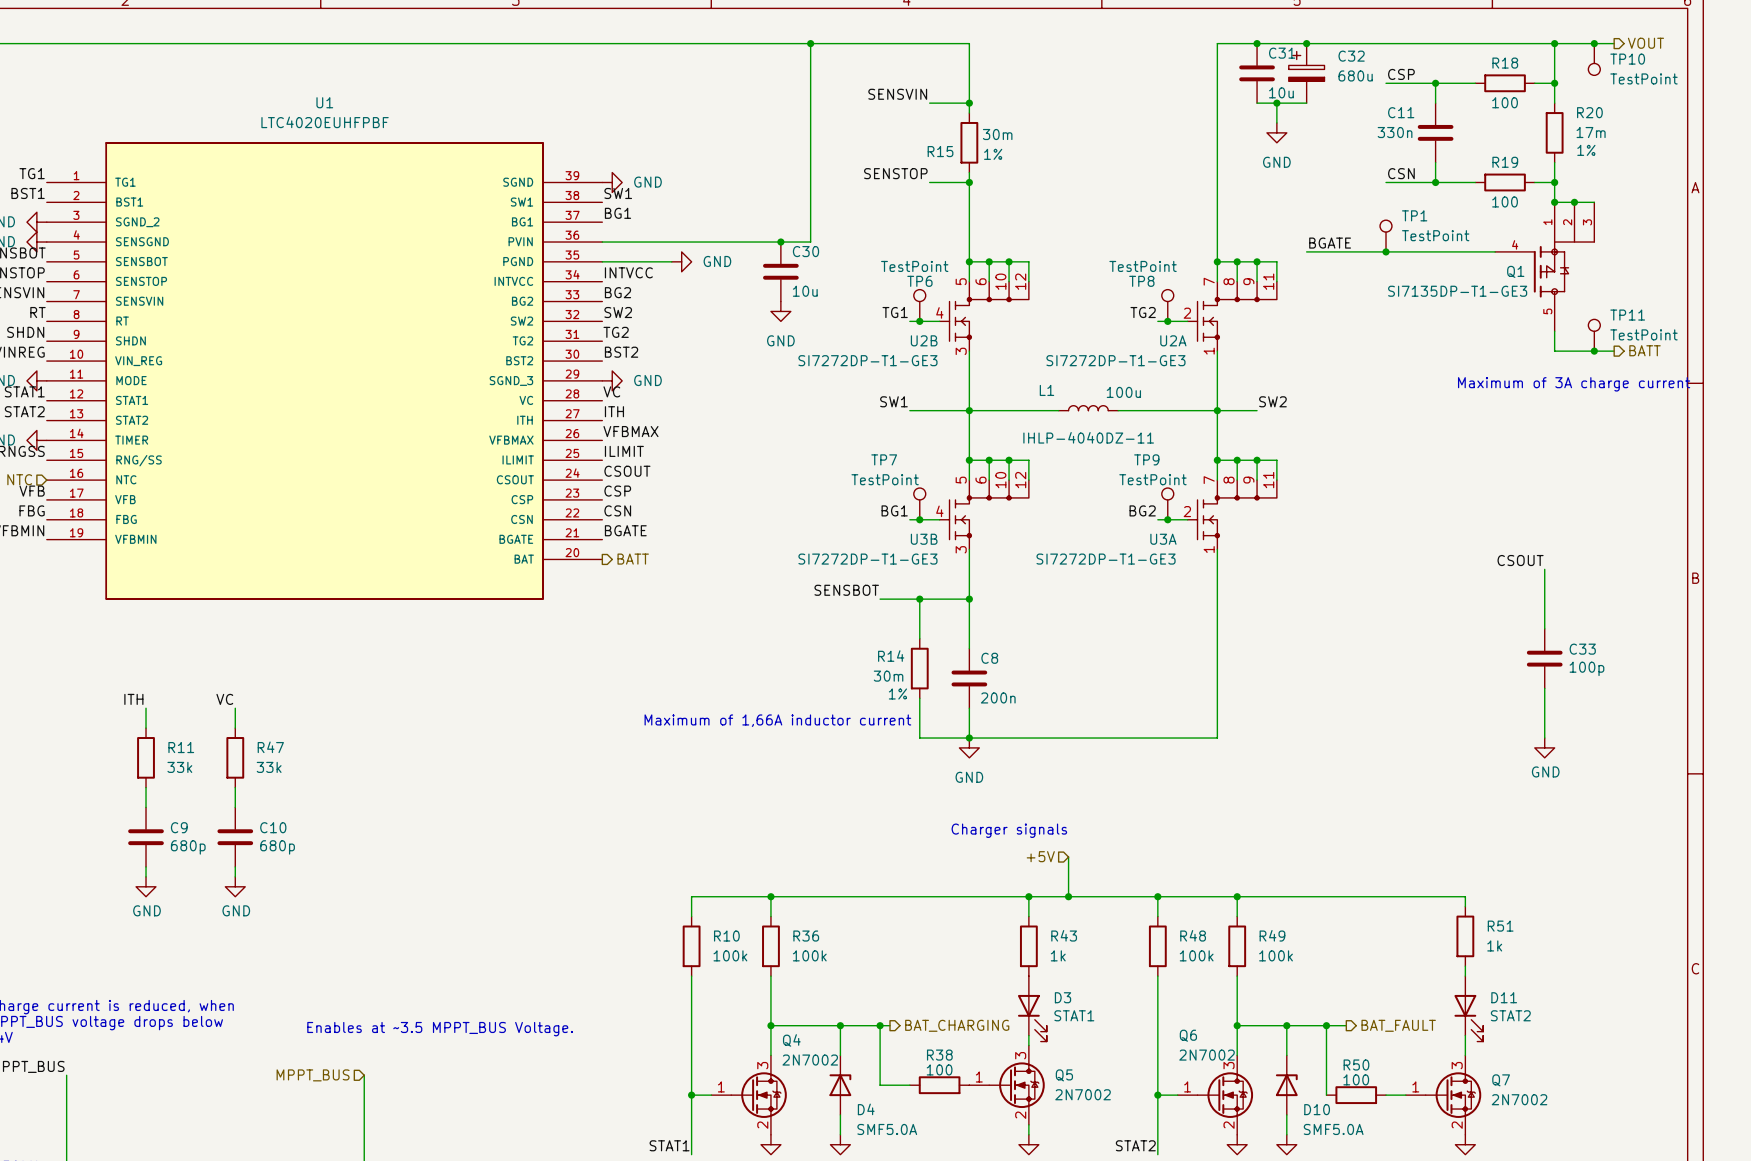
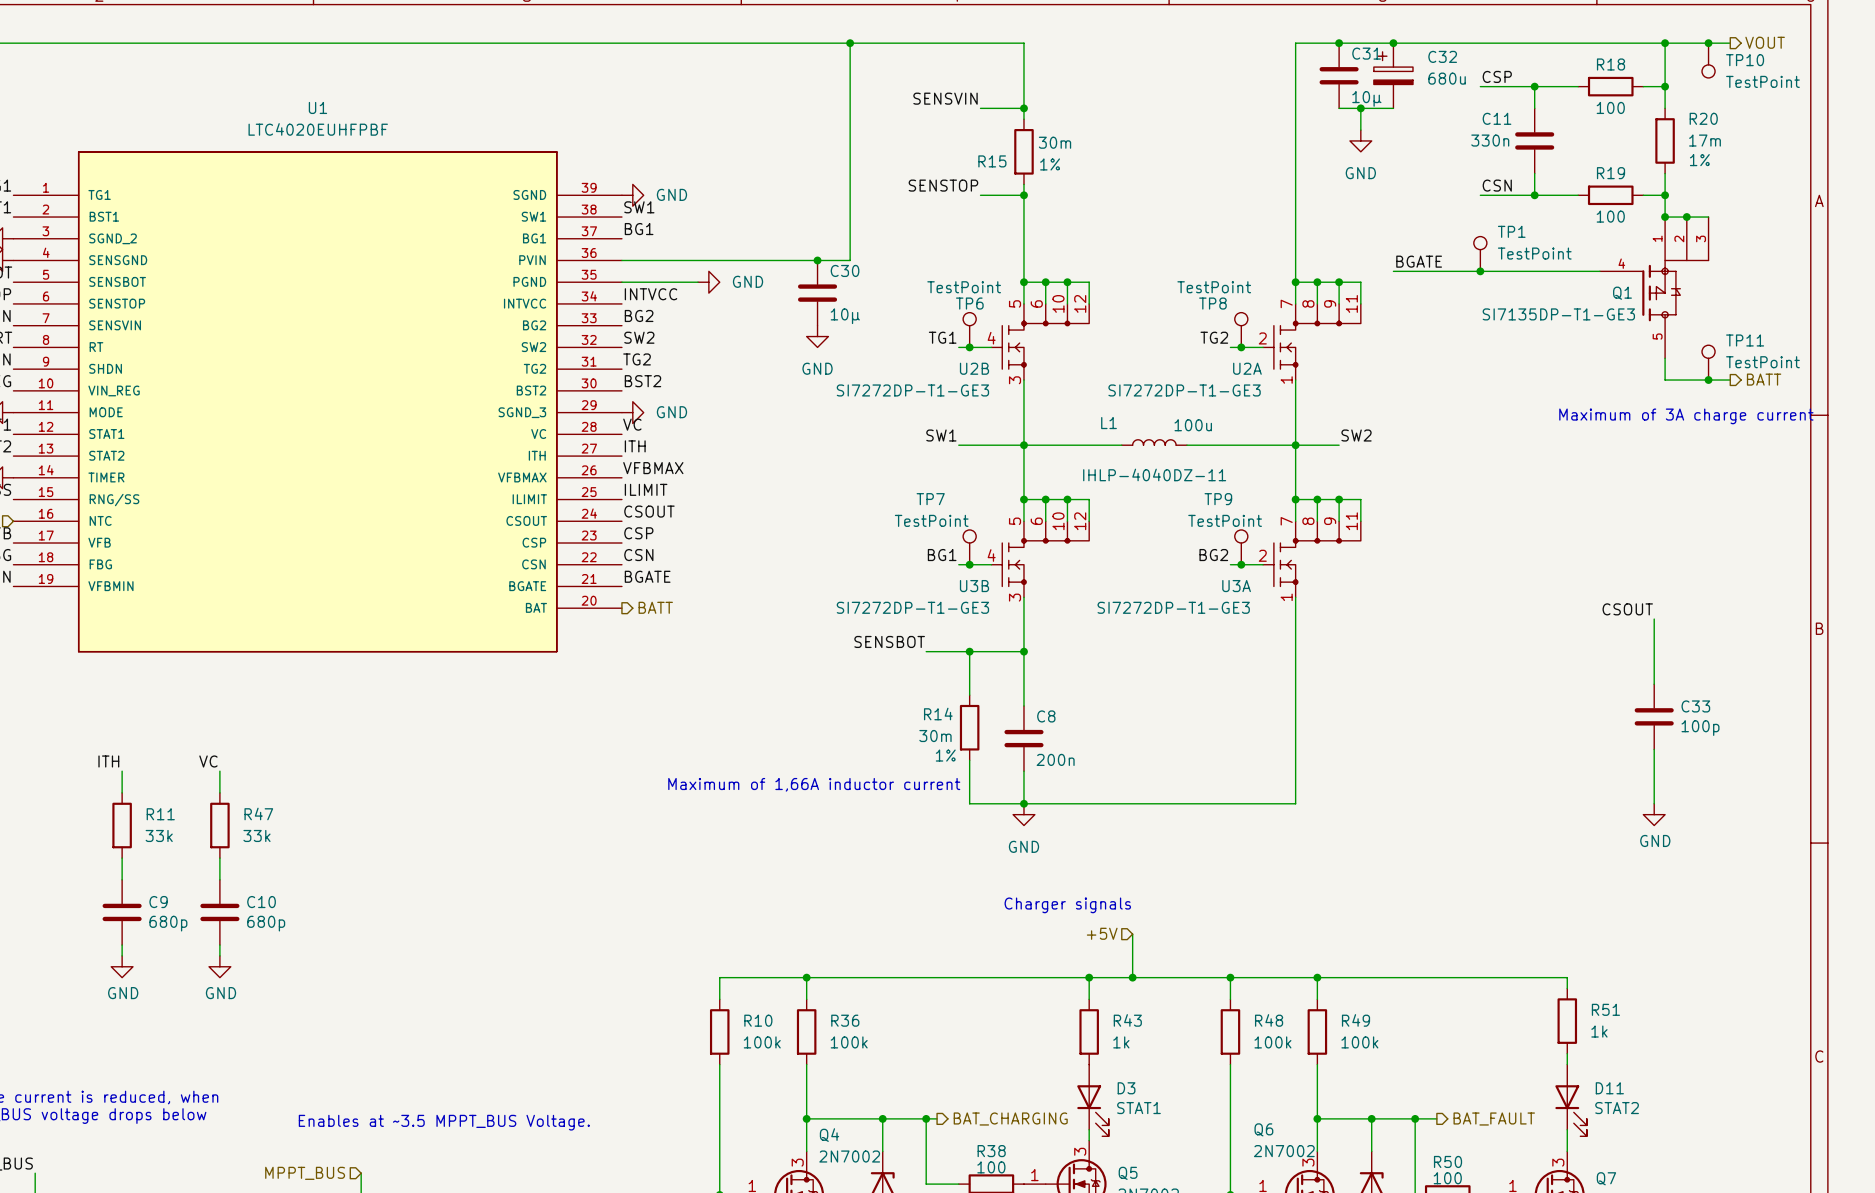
C31 value: 10u (1281, 92) -> 10µ (1366, 98)
C30 value: 10u (805, 291) -> 10µ (845, 316)

